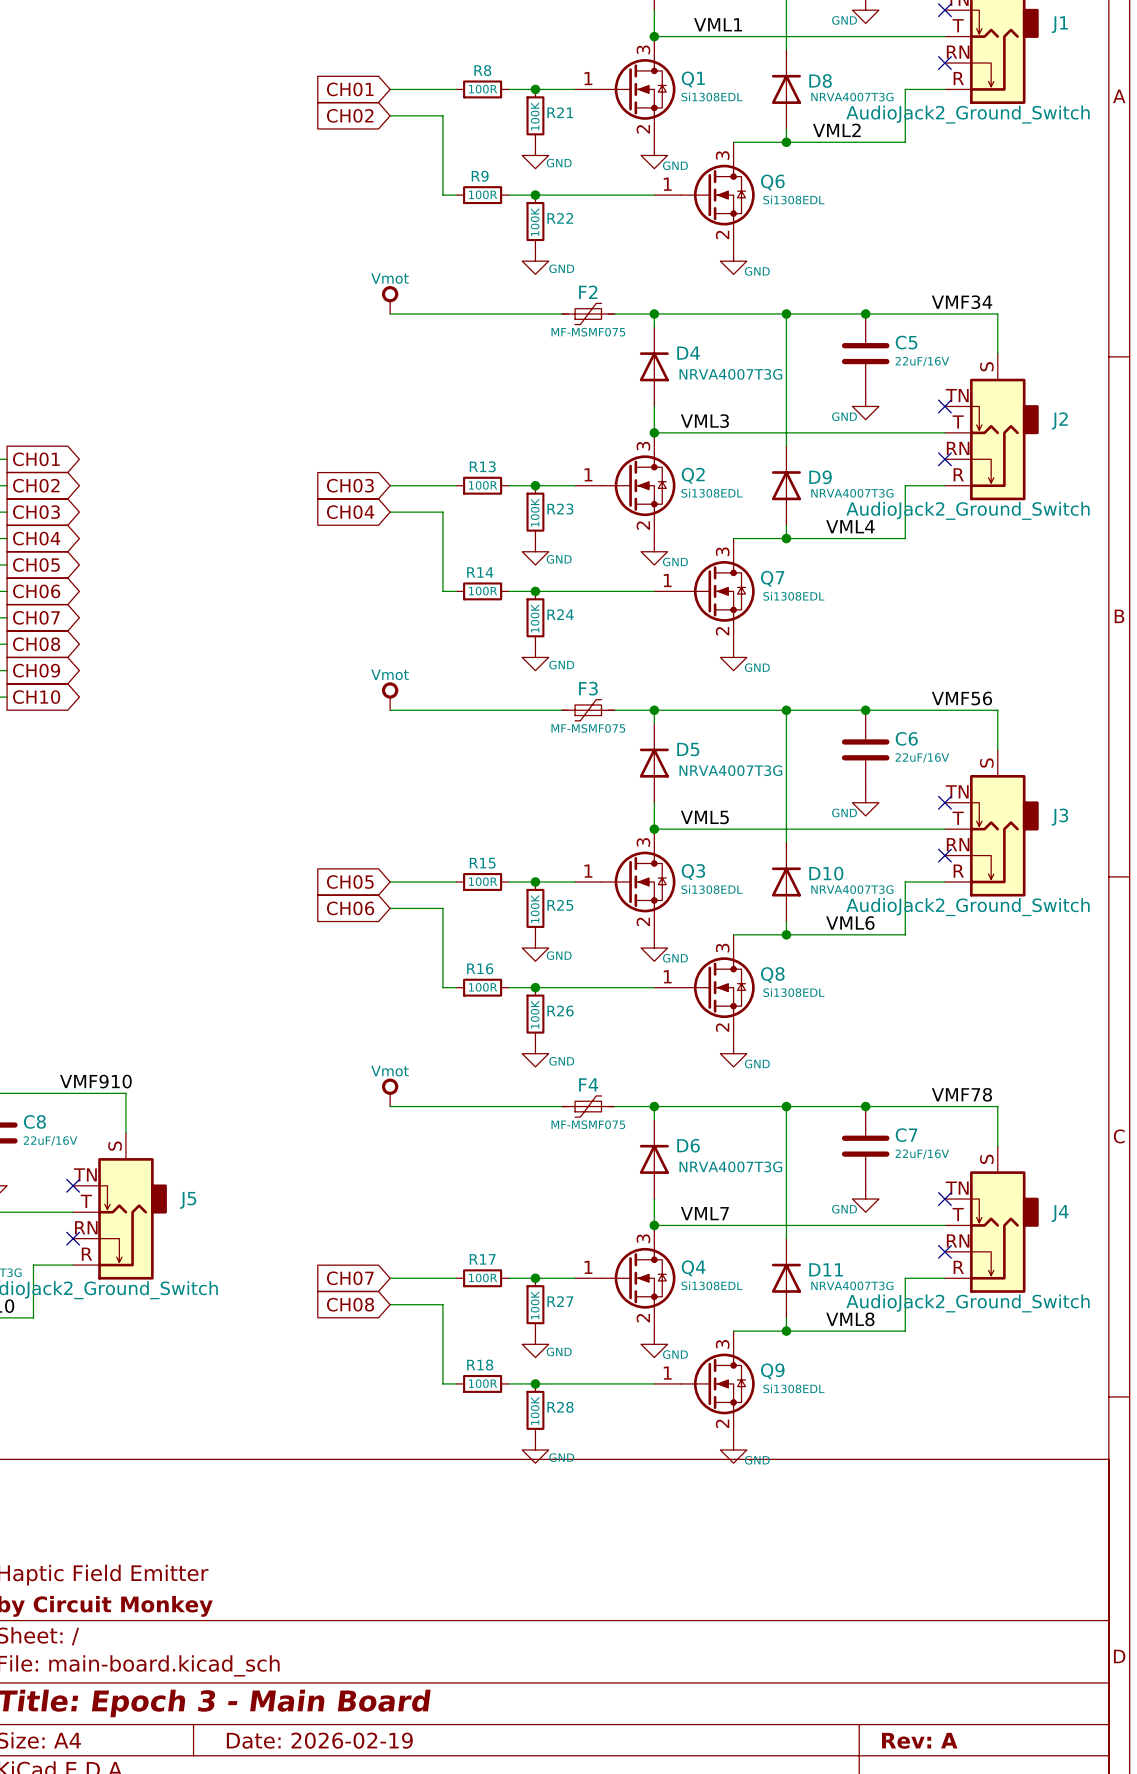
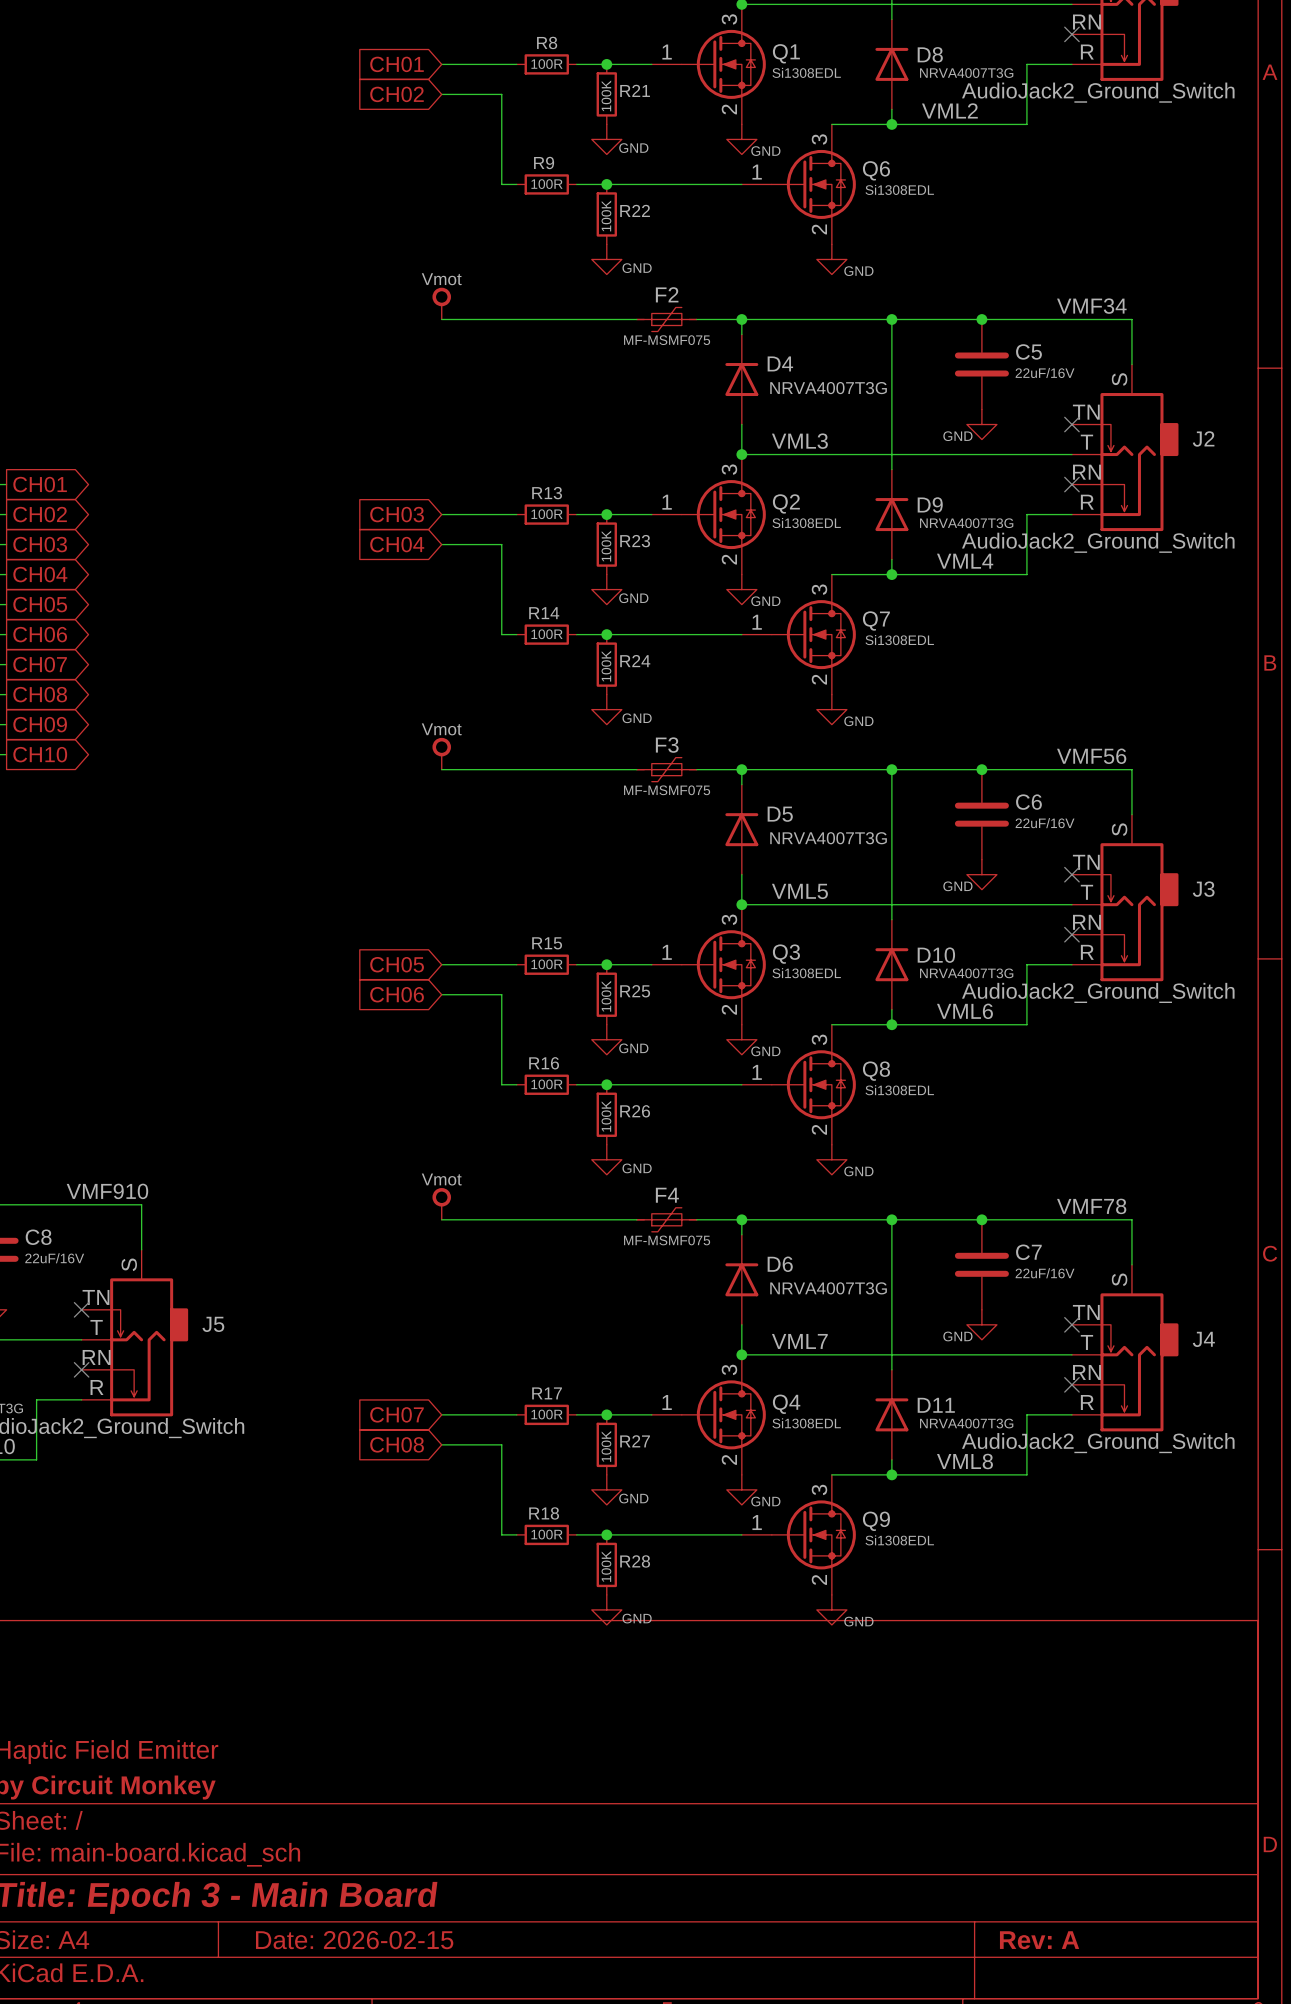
title block: Date: 2026-02-19 (319, 1740) -> Date: 2026-02-15 (354, 1940)

